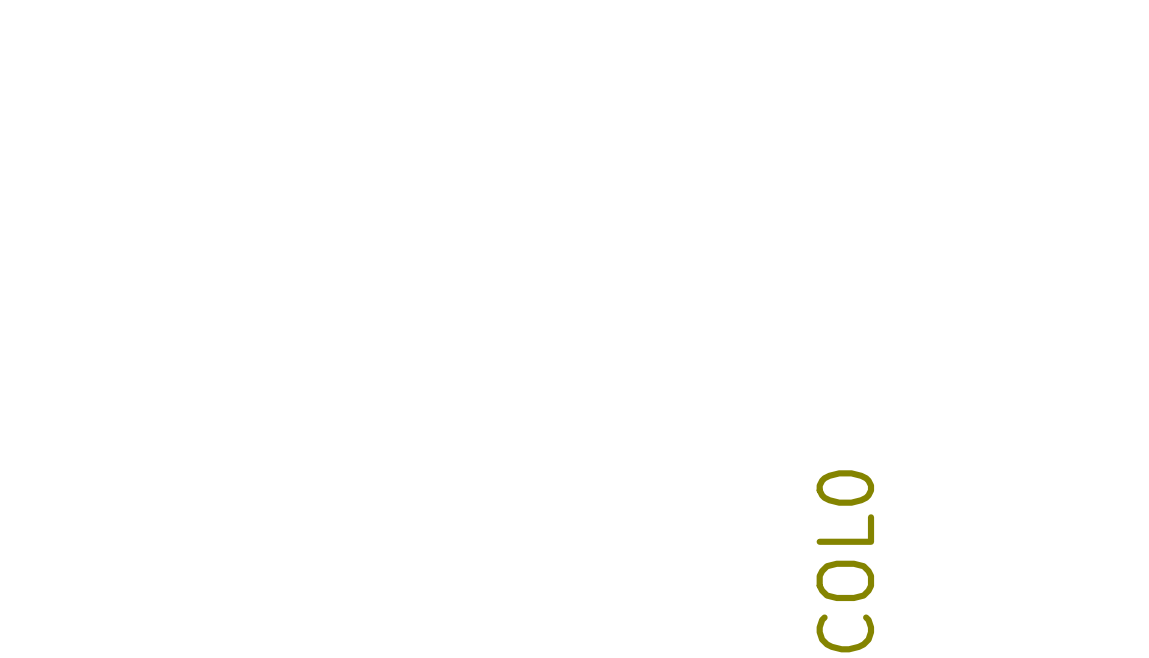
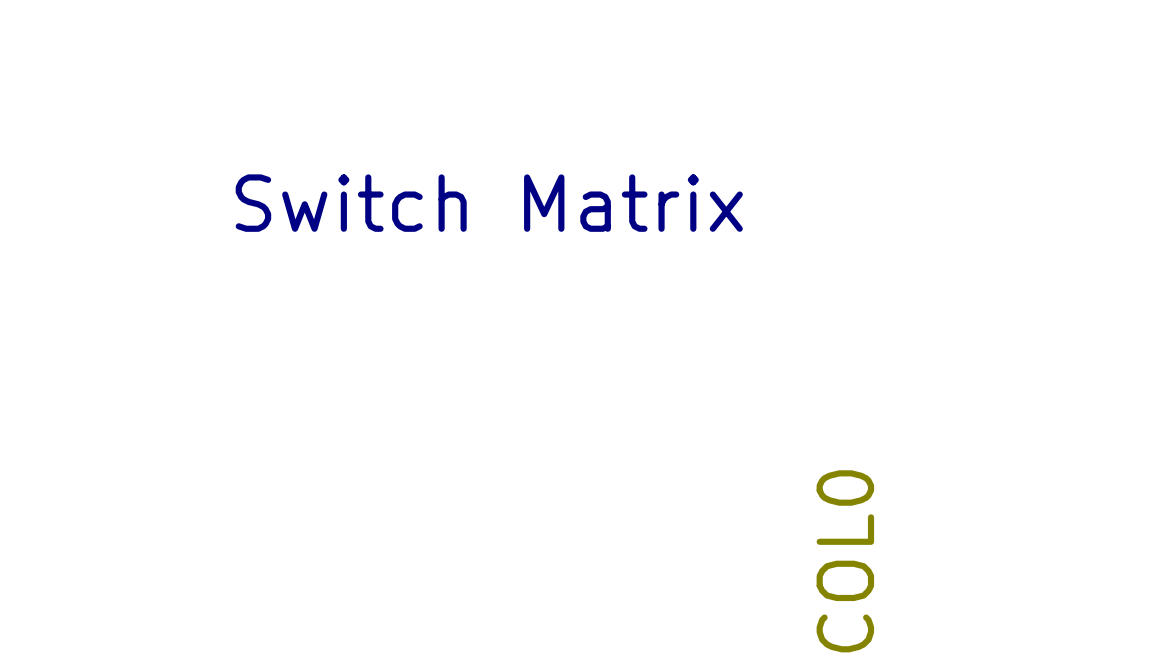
text: none -> Switch Matrix (489, 203)

